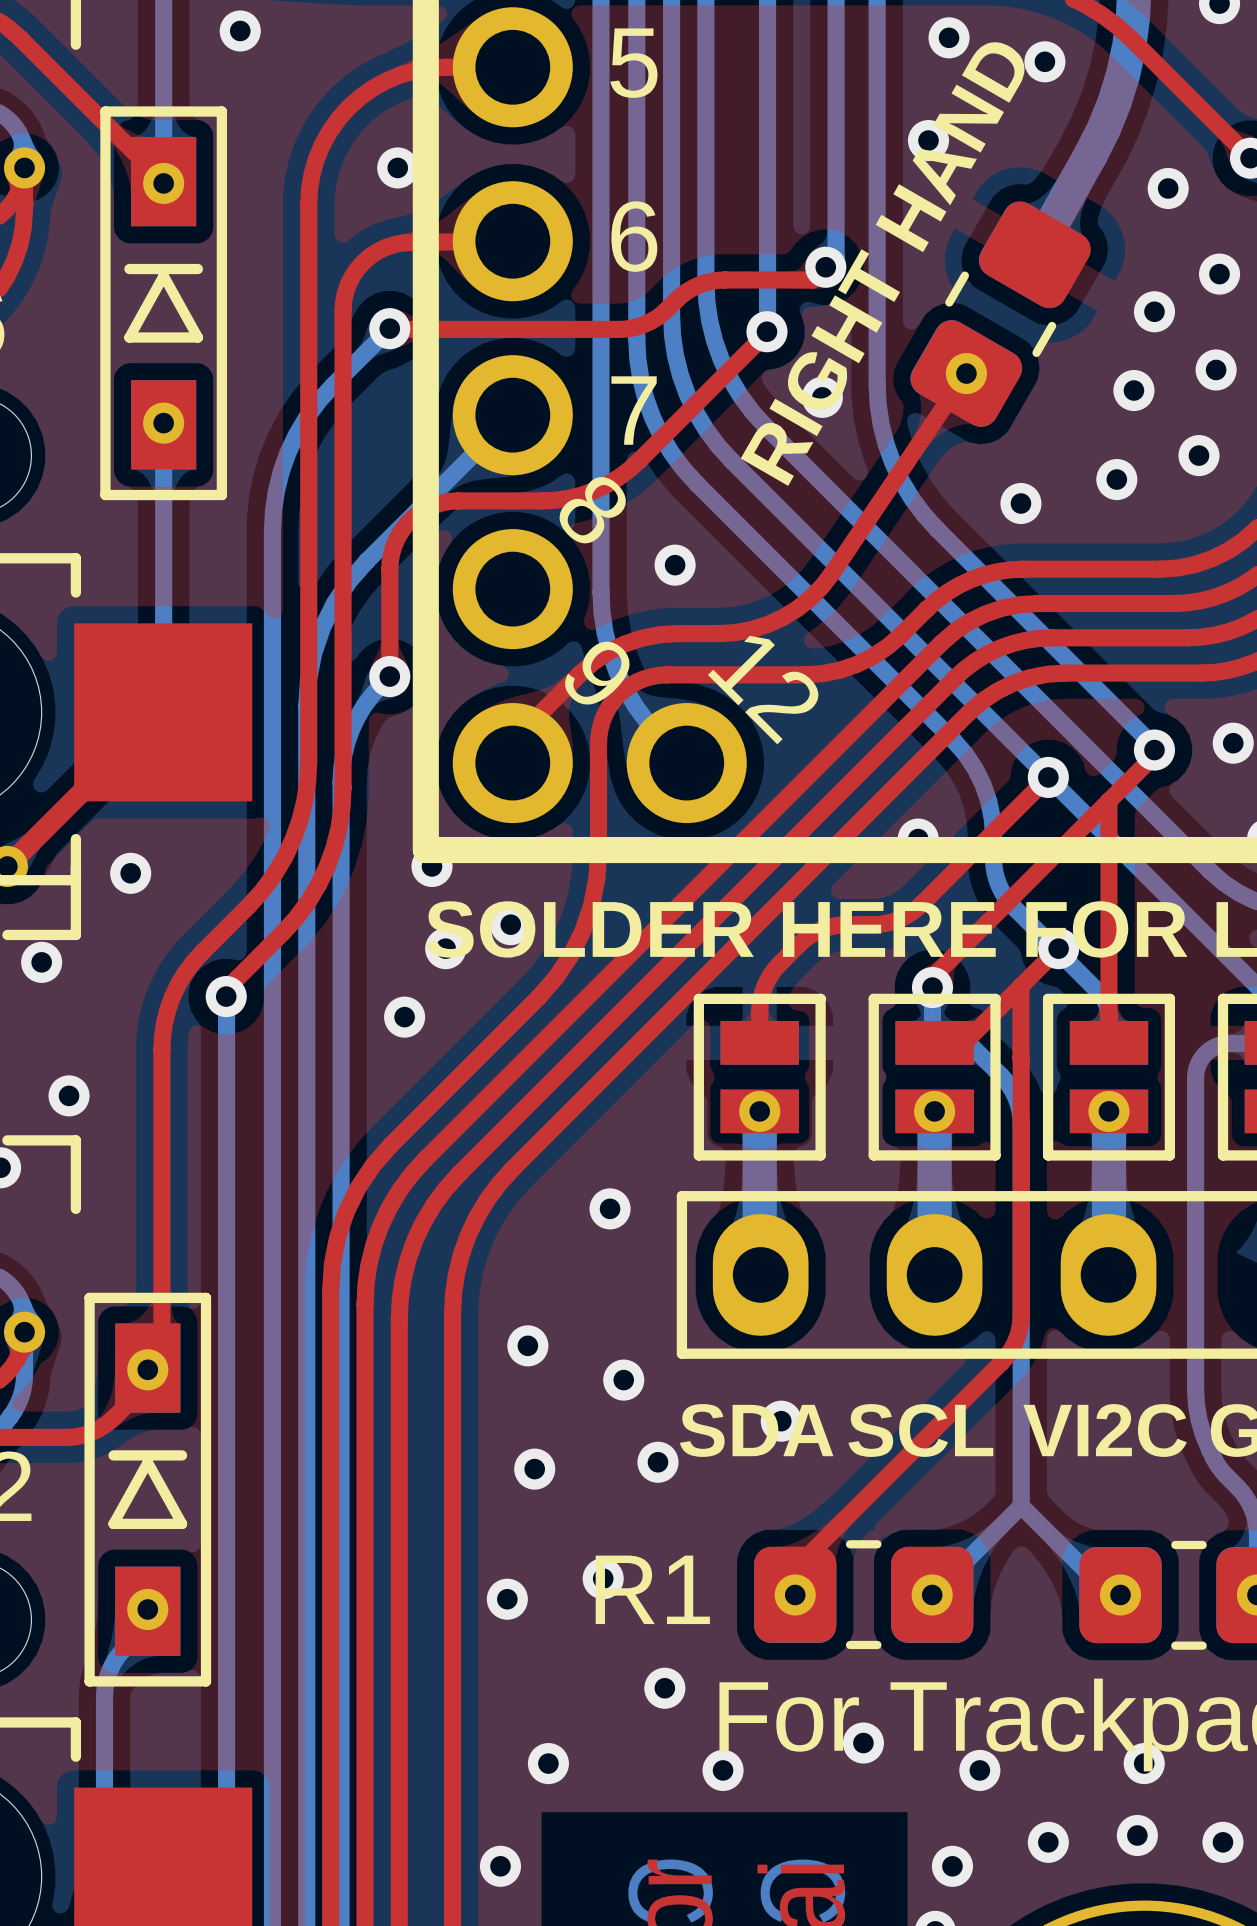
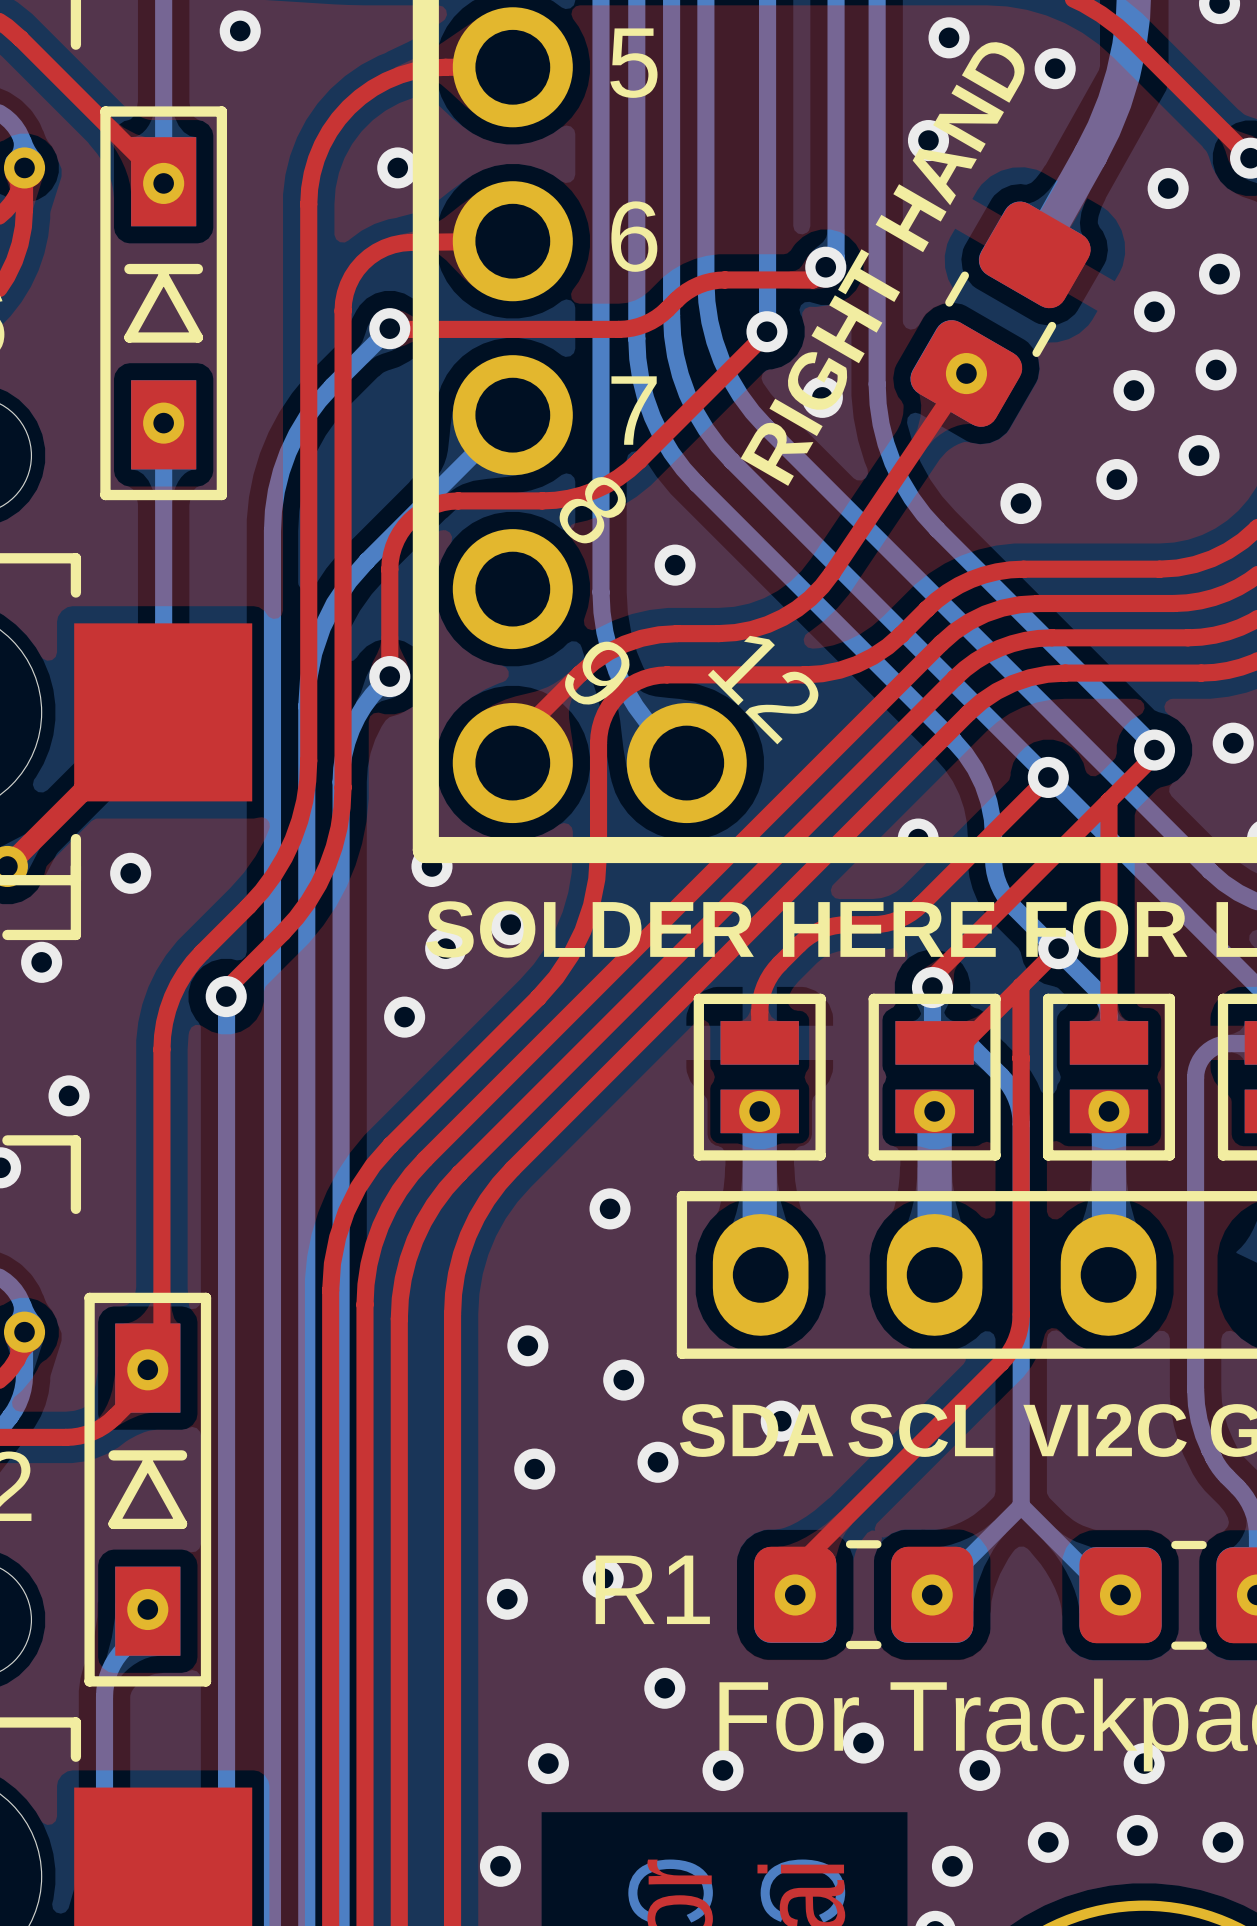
via position: (1044, 61) -> (1055, 68)

